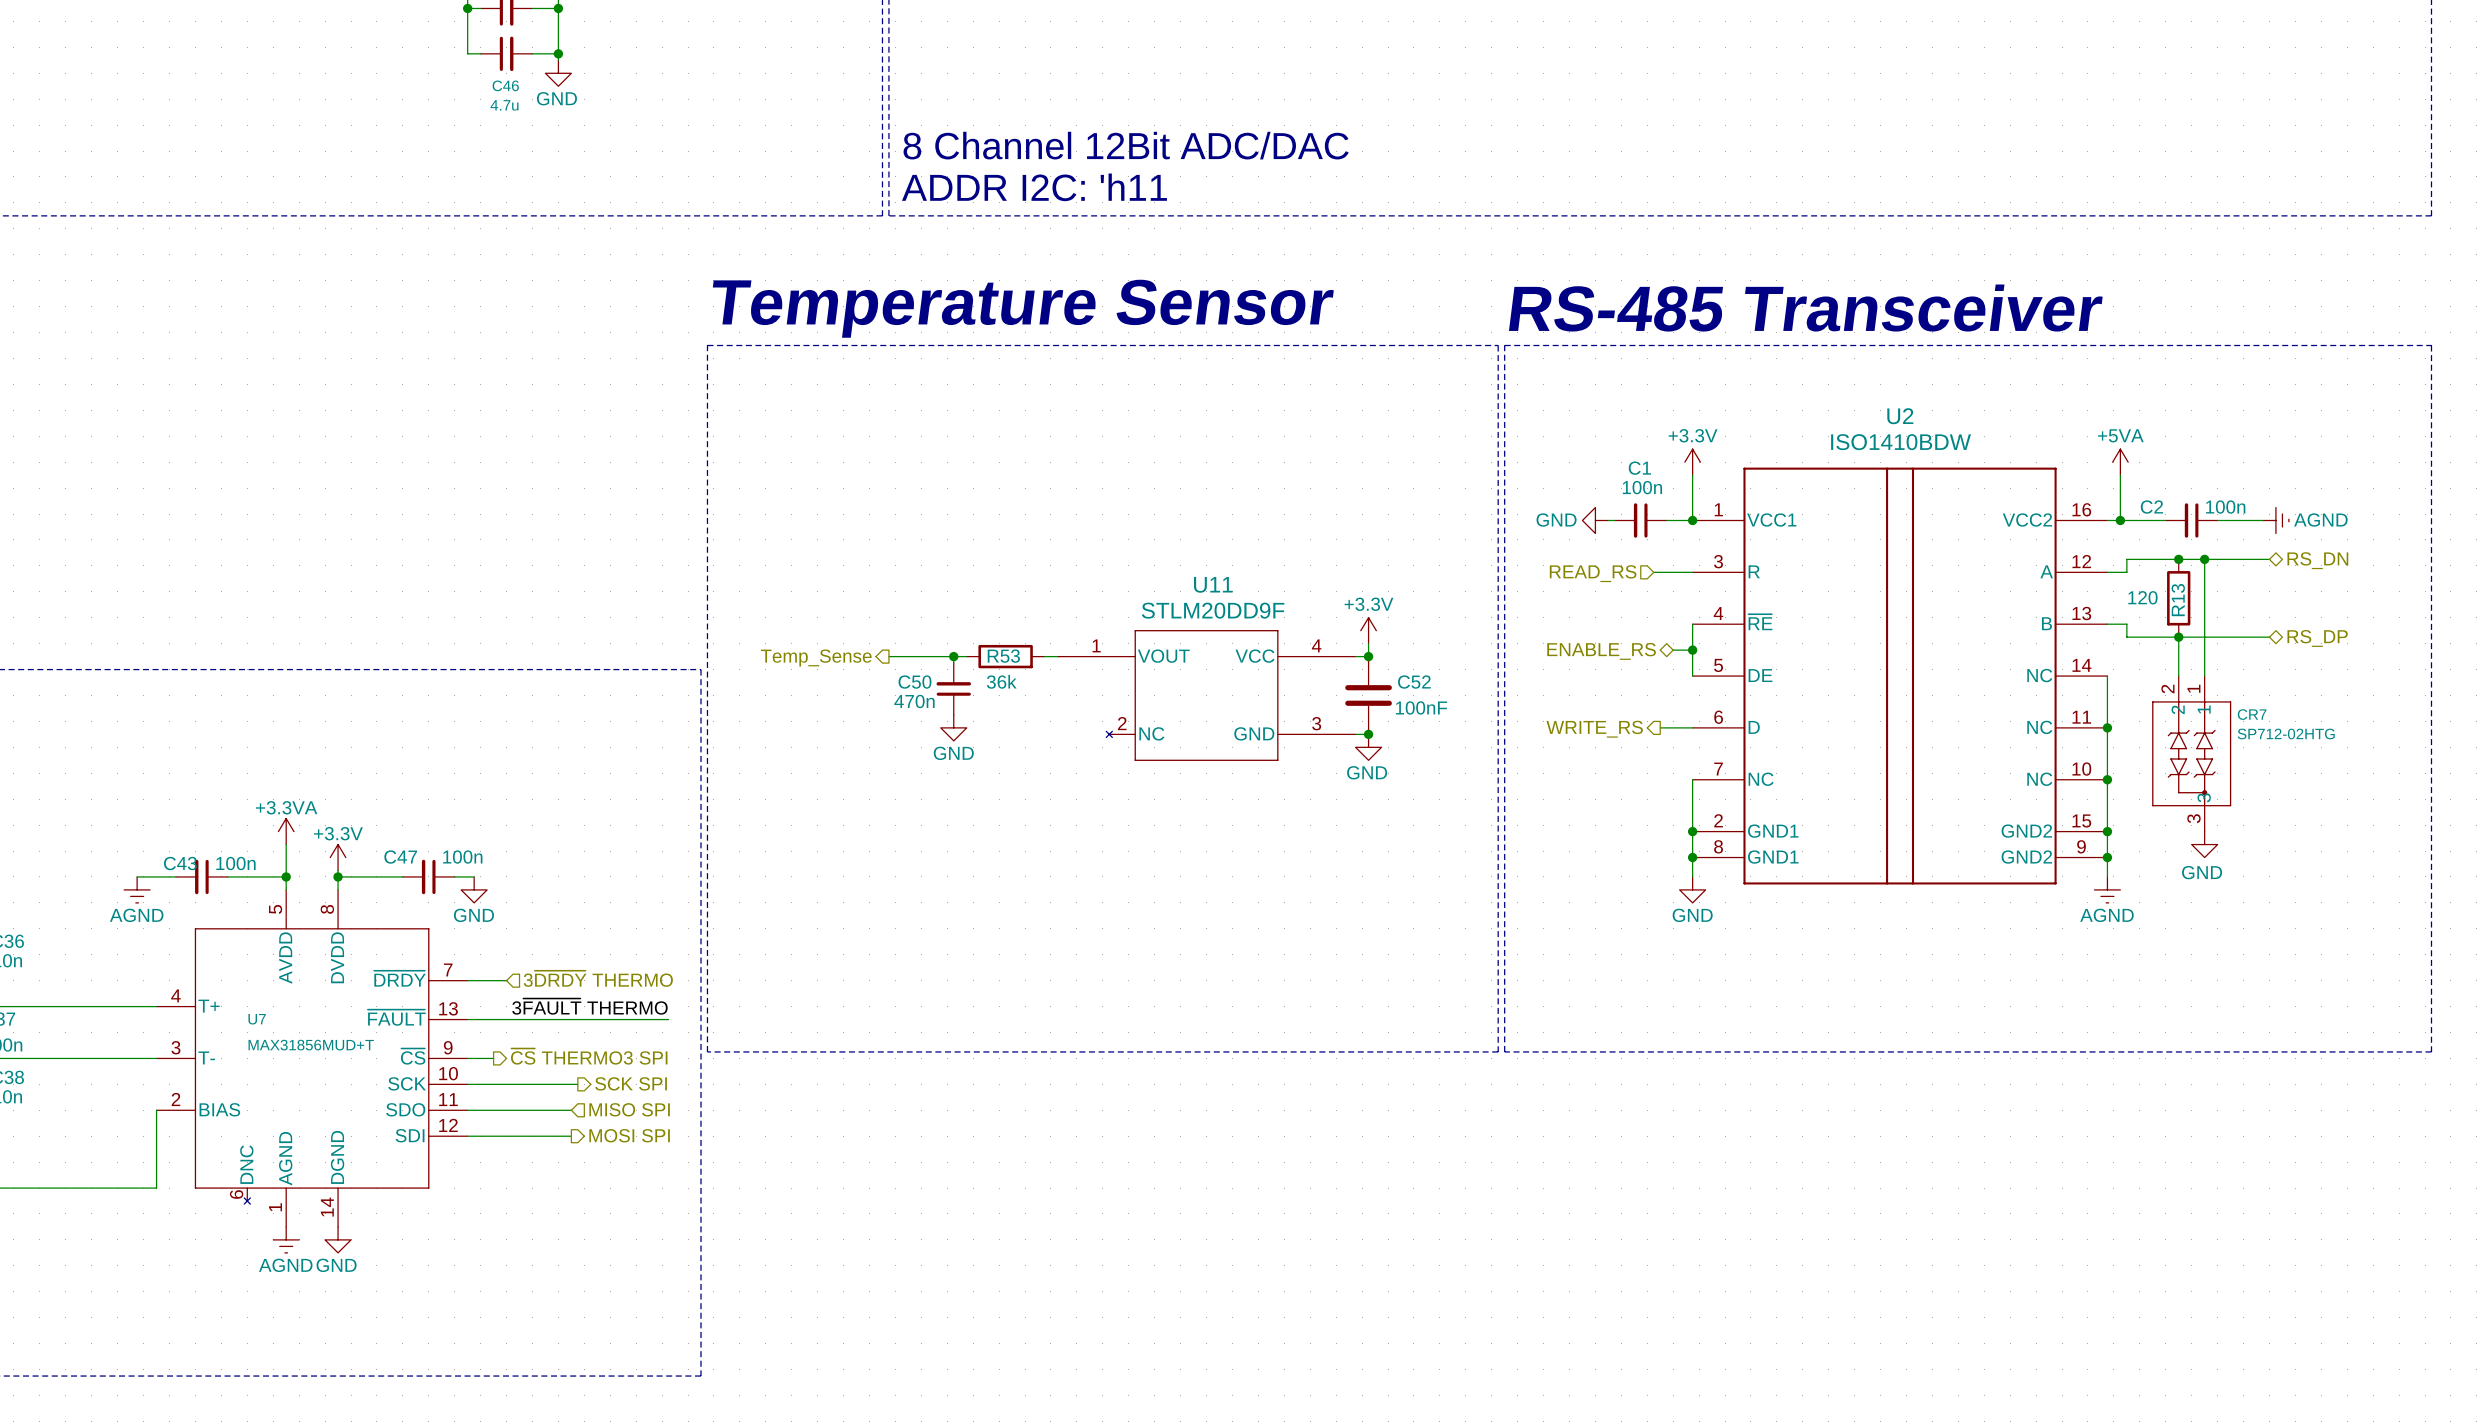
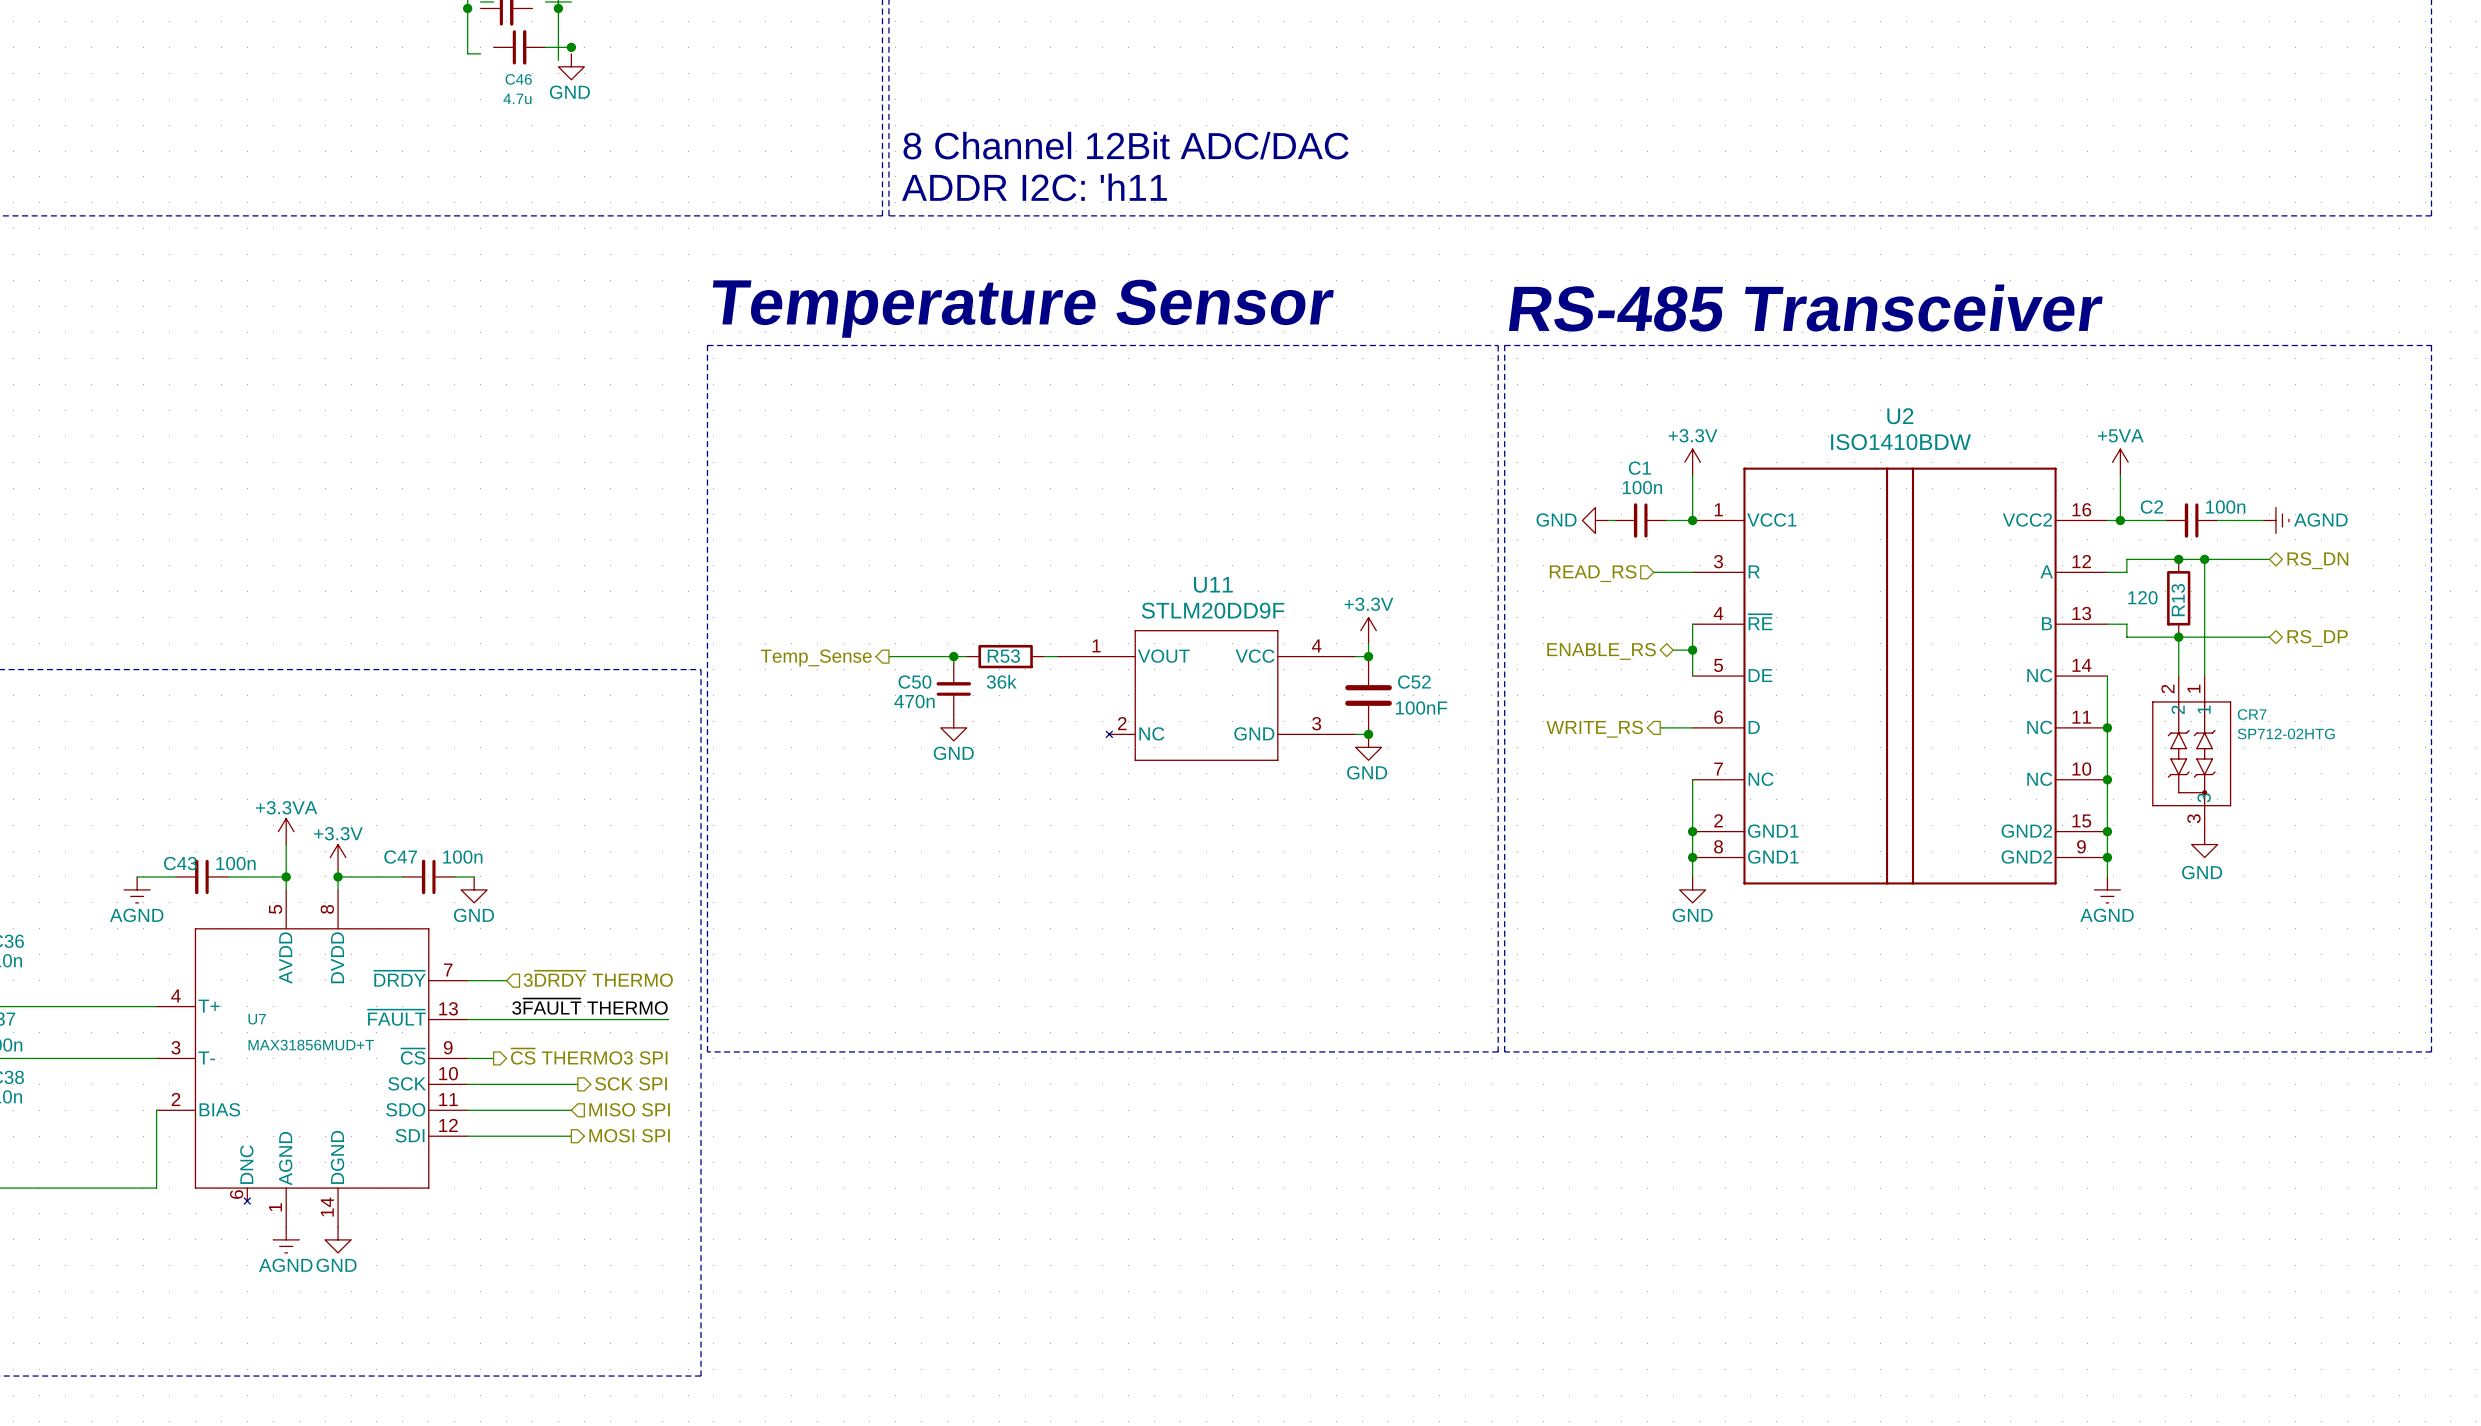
wire: (467, 8) (480, 8) -> (480, 1) (493, 1)
wire: (532, 8) (558, 8) -> (545, 1) (571, 1)
C46 position: (506, 53) -> (519, 47)
wire: (532, 53) (558, 53) -> (545, 47) (571, 47)
junction position: (558, 53) -> (571, 47)
power symbol position: GND (558, 73) -> GND (571, 66)

